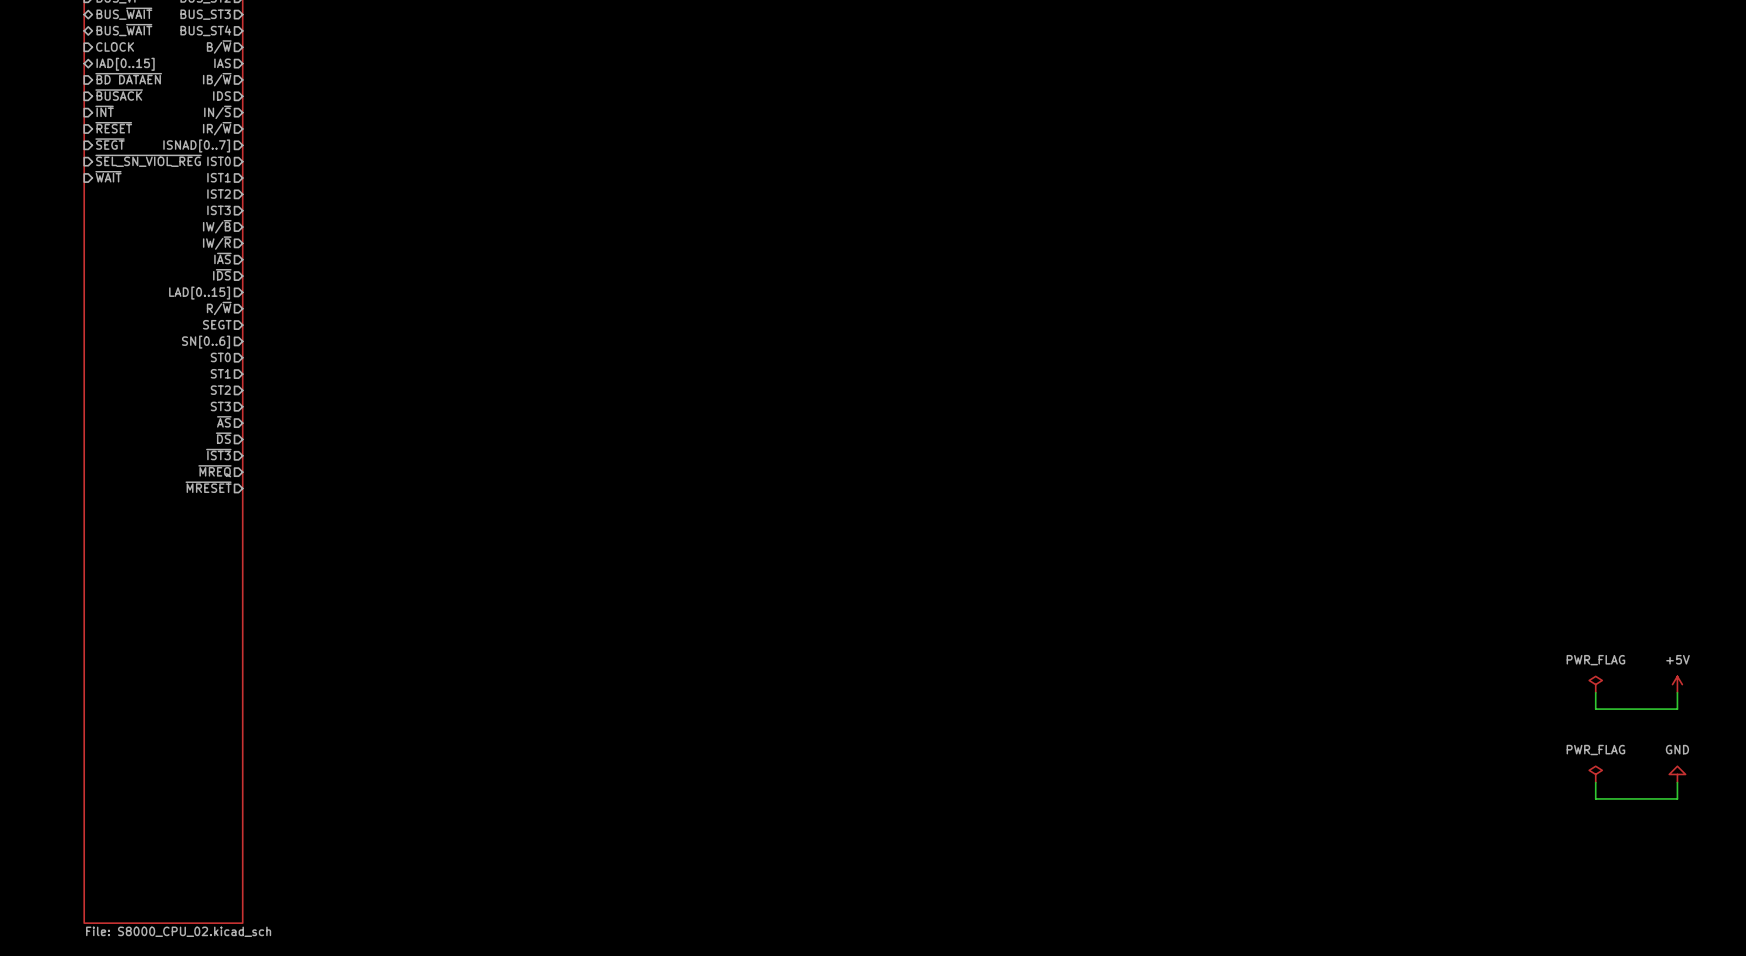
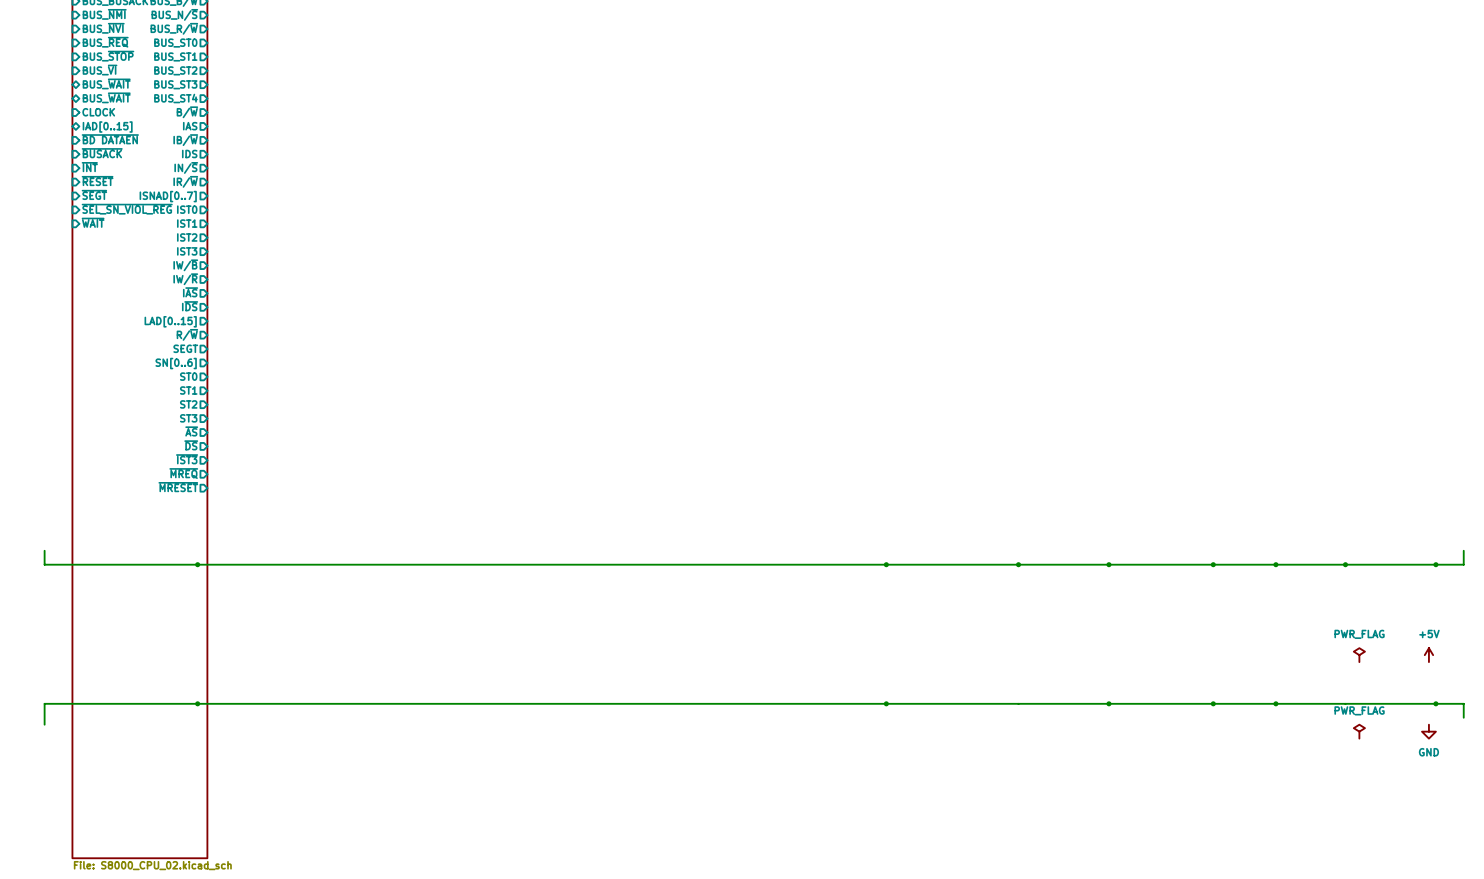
wire: none -> (44, 550) (44, 564) (1463, 564) (1463, 550)
junction: none -> (197, 564)
junction: none -> (886, 564)
junction: none -> (1018, 564)
junction: none -> (1108, 564)
junction: none -> (1213, 564)
junction: none -> (1275, 564)
junction: none -> (1345, 564)
junction: none -> (1435, 564)
wire: (1595, 692) (1595, 709) (1677, 709) (1677, 692) -> none
junction: none -> (197, 703)
junction: none -> (886, 703)
junction: none -> (1108, 703)
junction: none -> (1213, 703)
junction: none -> (1275, 703)
junction: none -> (1435, 703)
wire: none -> (1463, 717) (1463, 703) (44, 703) (44, 724)
power symbol rotation: 0° (1677, 774) -> 180° (1428, 731)
wire: (1595, 782) (1595, 798) (1677, 798) (1677, 782) -> none

